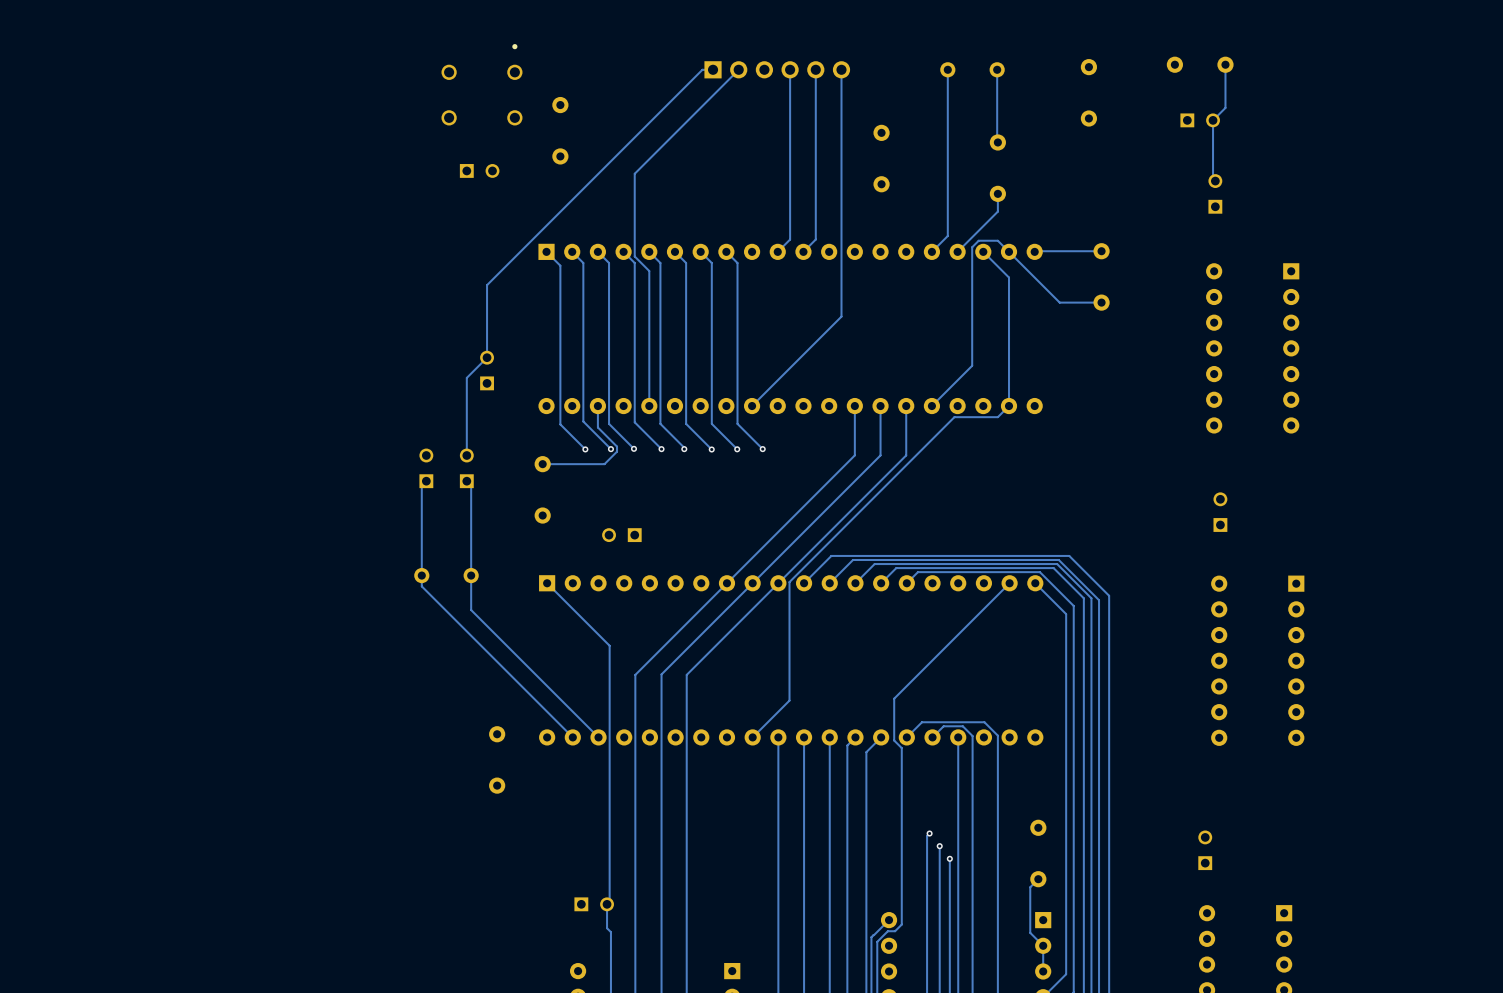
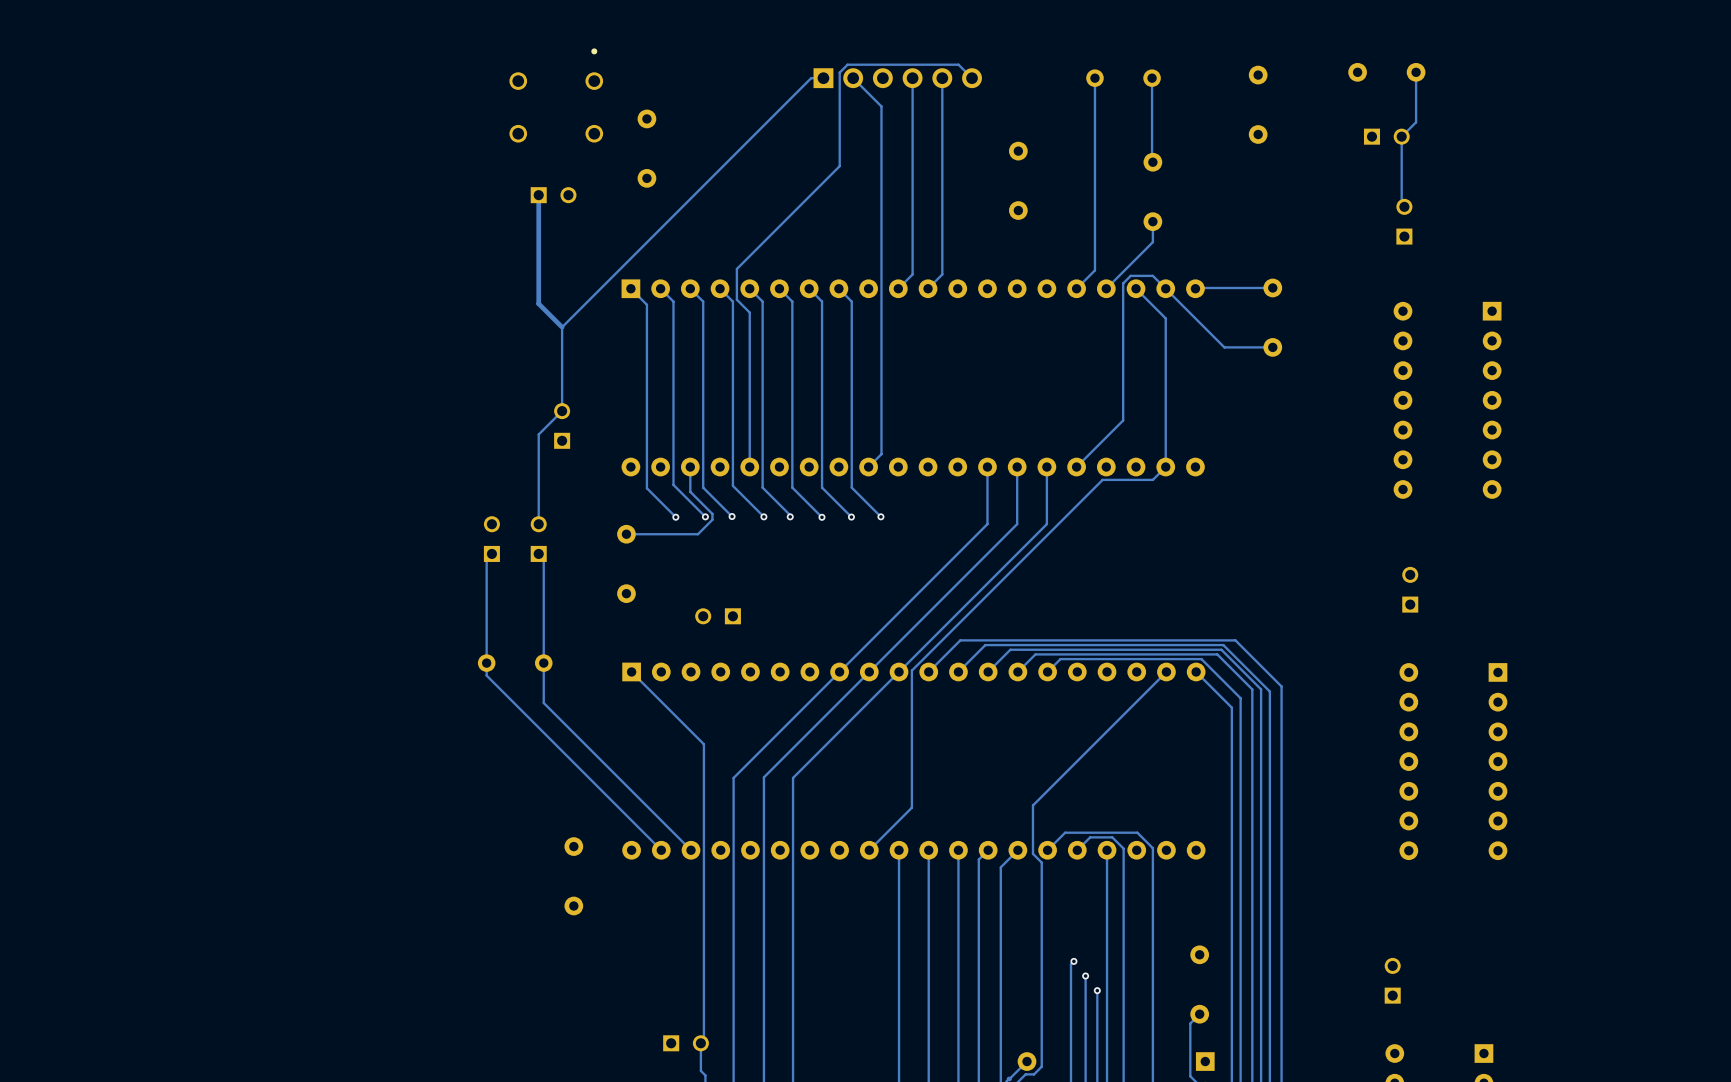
track: (738, 69) (634, 173) (634, 256) (649, 272) -> (972, 78) (958, 64) (847, 64) (839, 72) (839, 166) (736, 268) (736, 299) (749, 312)
track: (841, 69) (841, 316) (763, 394) -> (853, 78) (881, 106) (881, 454)
track: none -> (538, 195) (538, 303) (562, 327)

